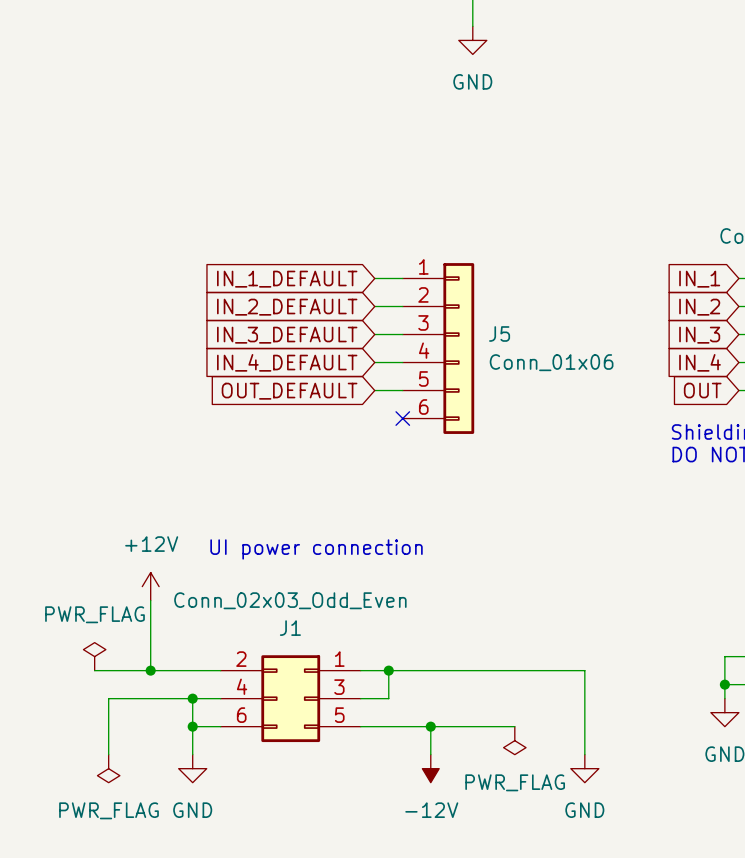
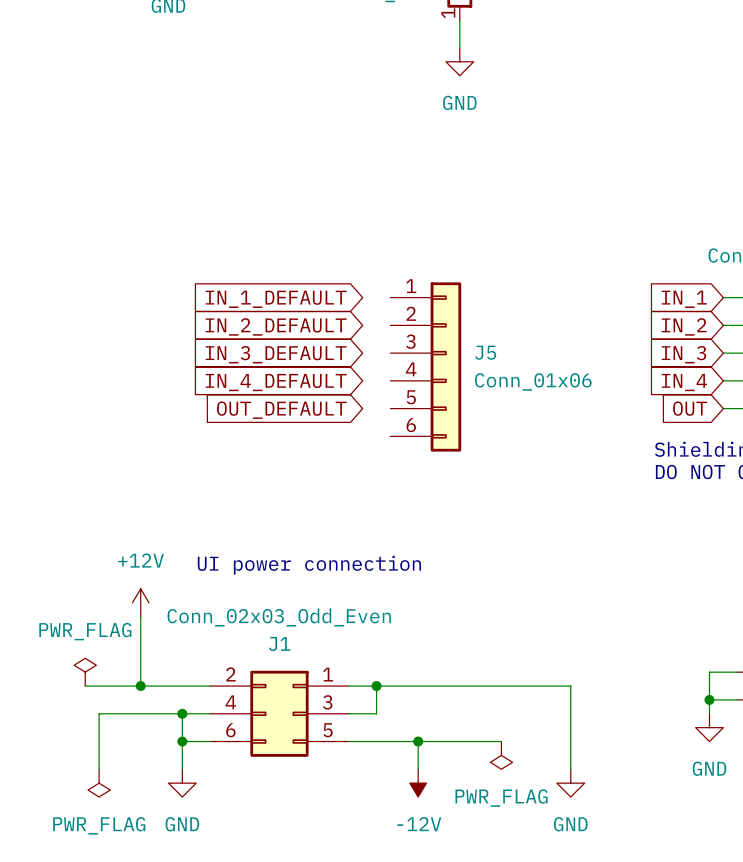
wire: (374, 278) (402, 278) -> none
wire: (374, 306) (402, 306) -> none
wire: (374, 334) (402, 334) -> none
wire: (374, 362) (402, 362) -> none
wire: (374, 390) (402, 390) -> none
no-connect mark: (402, 418) -> none

